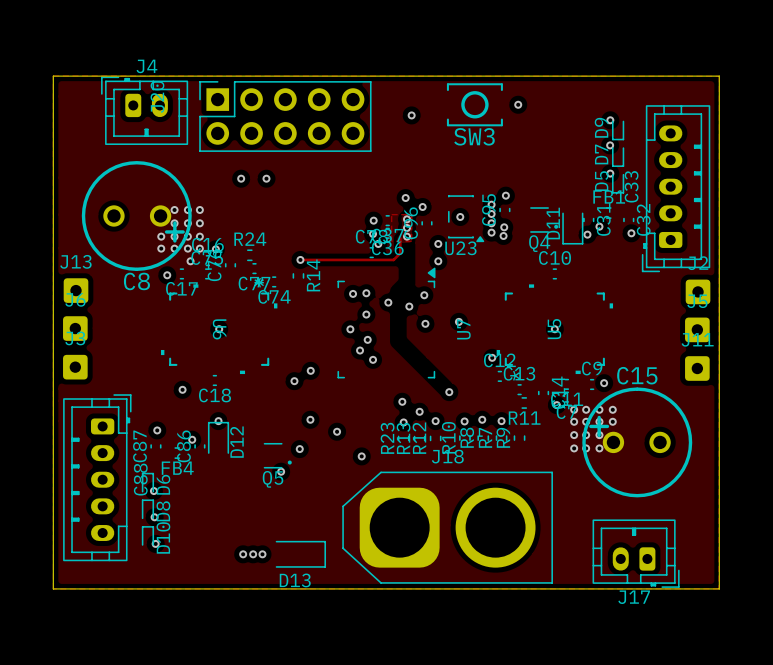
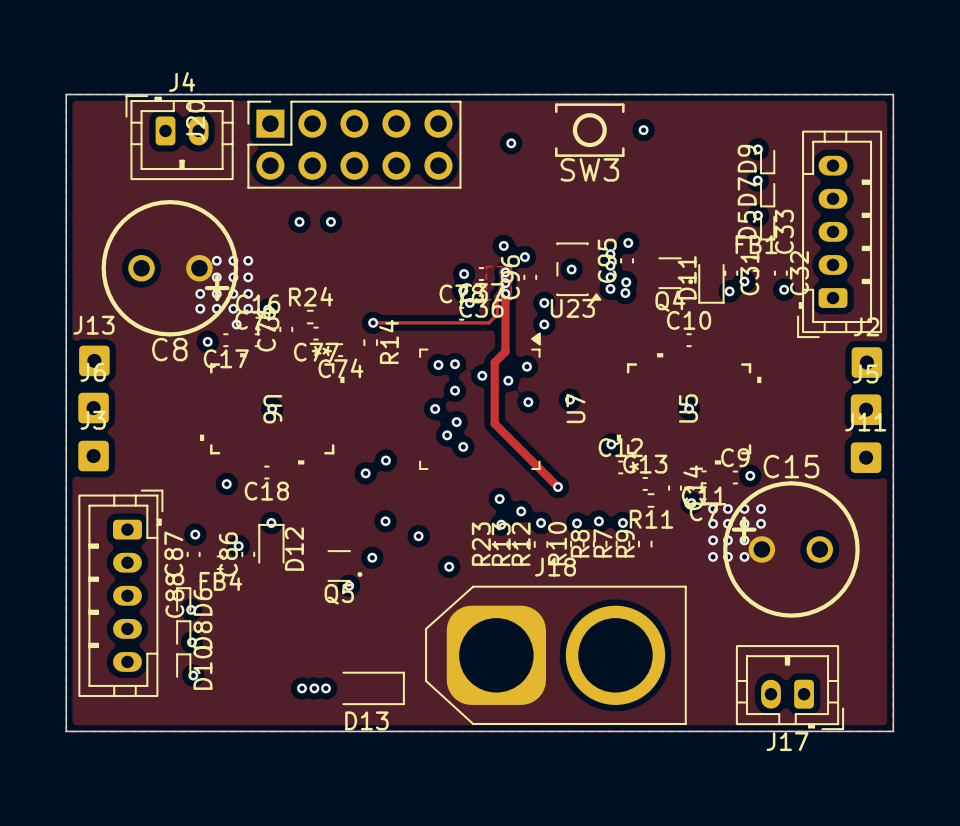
track: none -> (505, 293) (505, 351) (494, 362) (494, 423) (557, 487)

